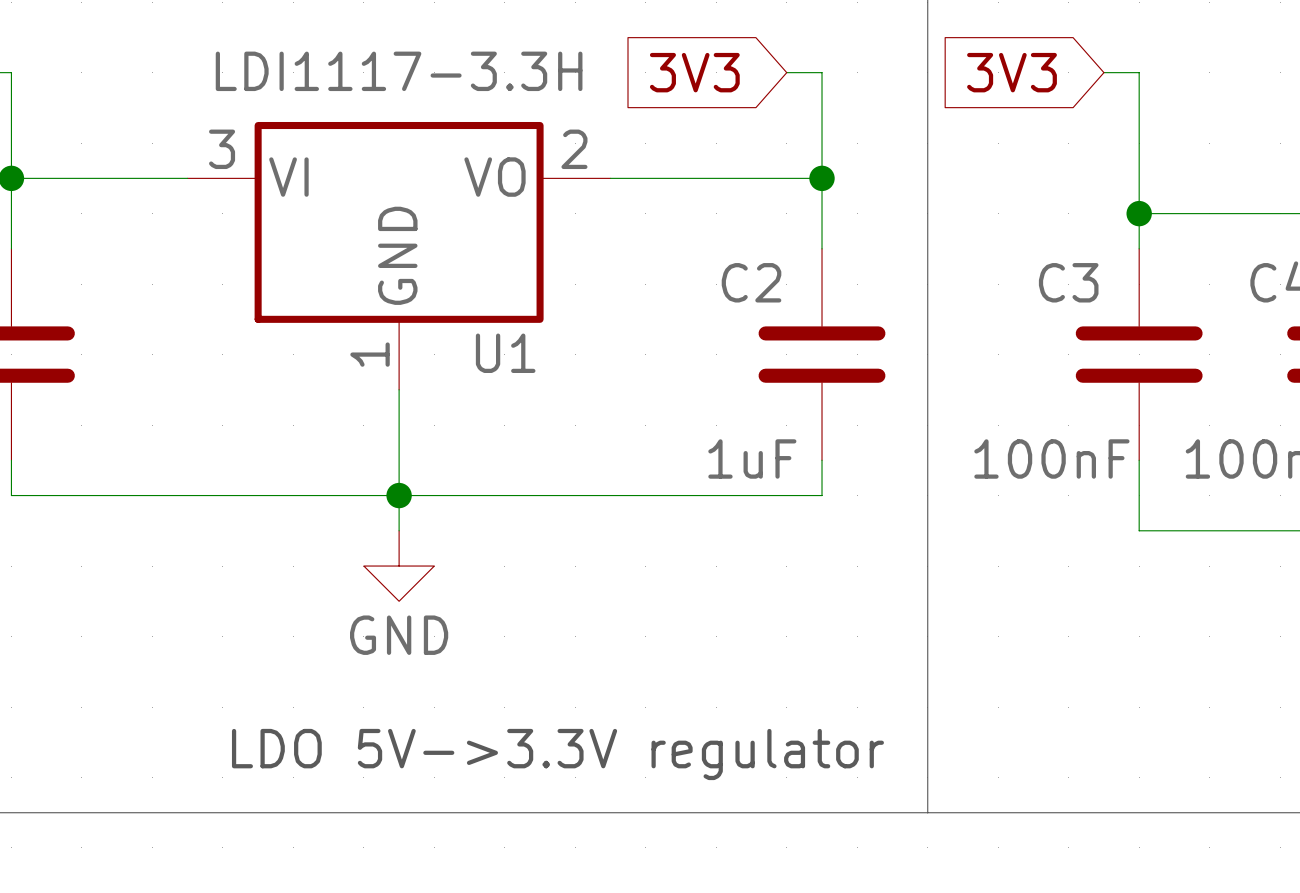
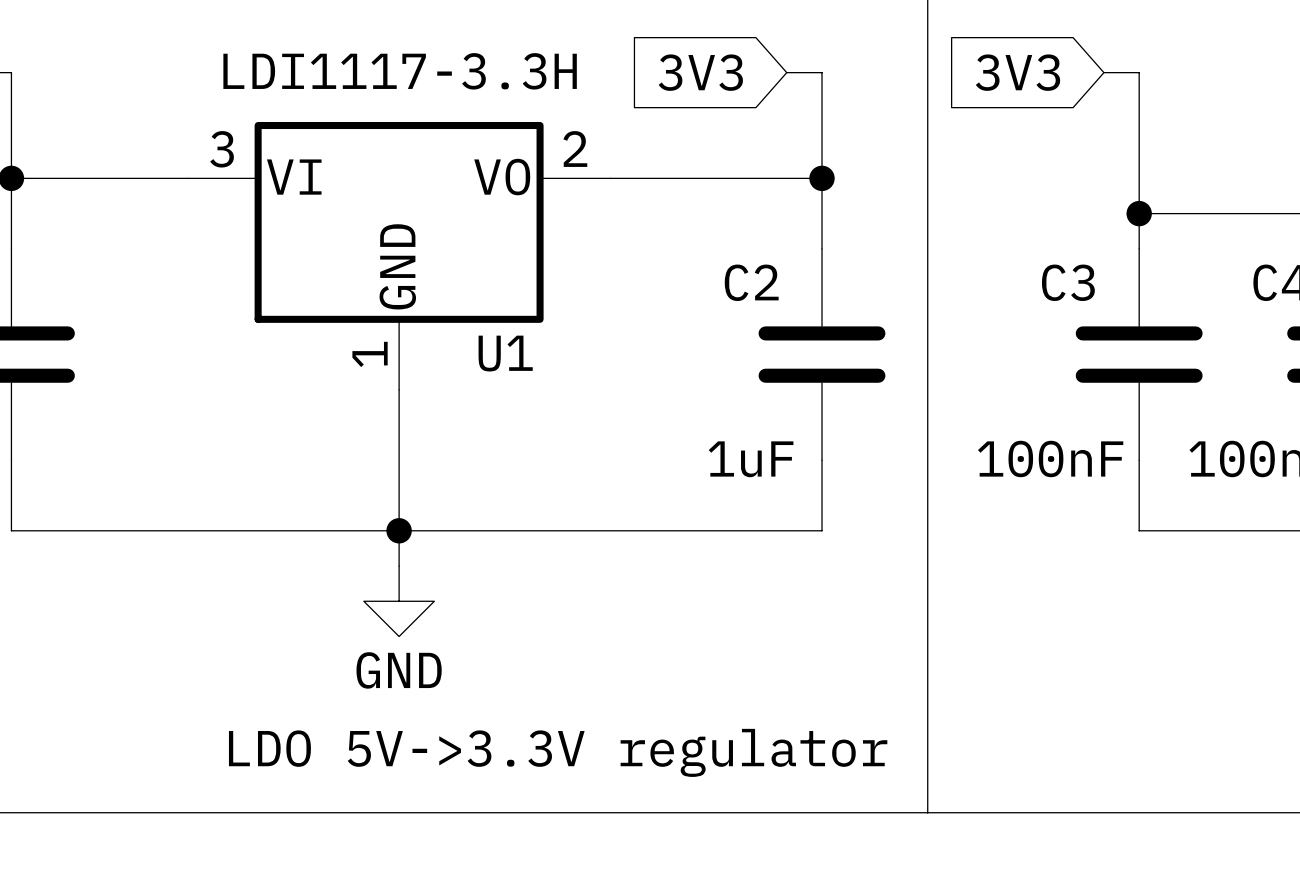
wire: (11, 495) (822, 495) -> (11, 495) (11, 530) (822, 530) (822, 495)
junction position: (399, 495) -> (399, 530)
power symbol position: GND (399, 566) -> GND (399, 601)

